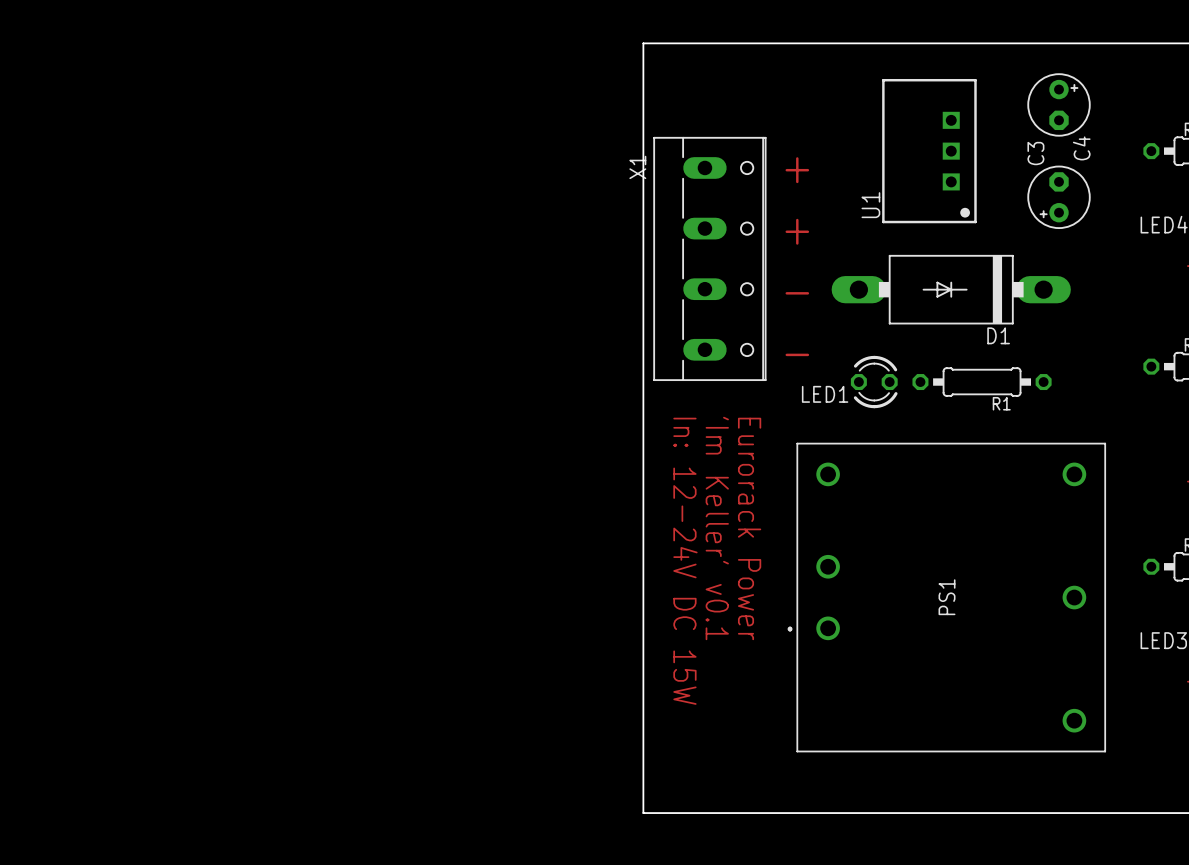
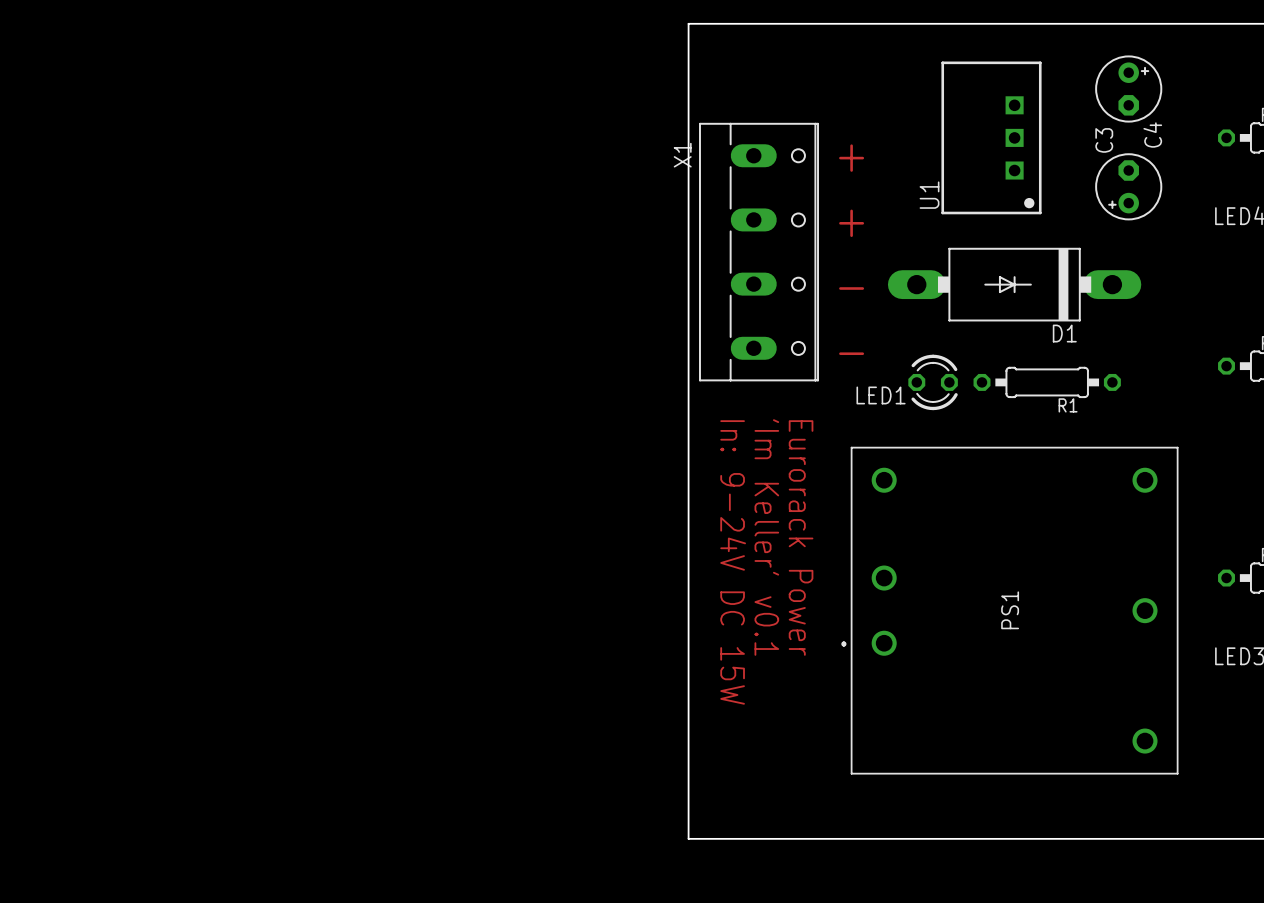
text: In: 12-24V DC 15W (685, 561) -> In: 9-24V DC 15W (733, 562)

